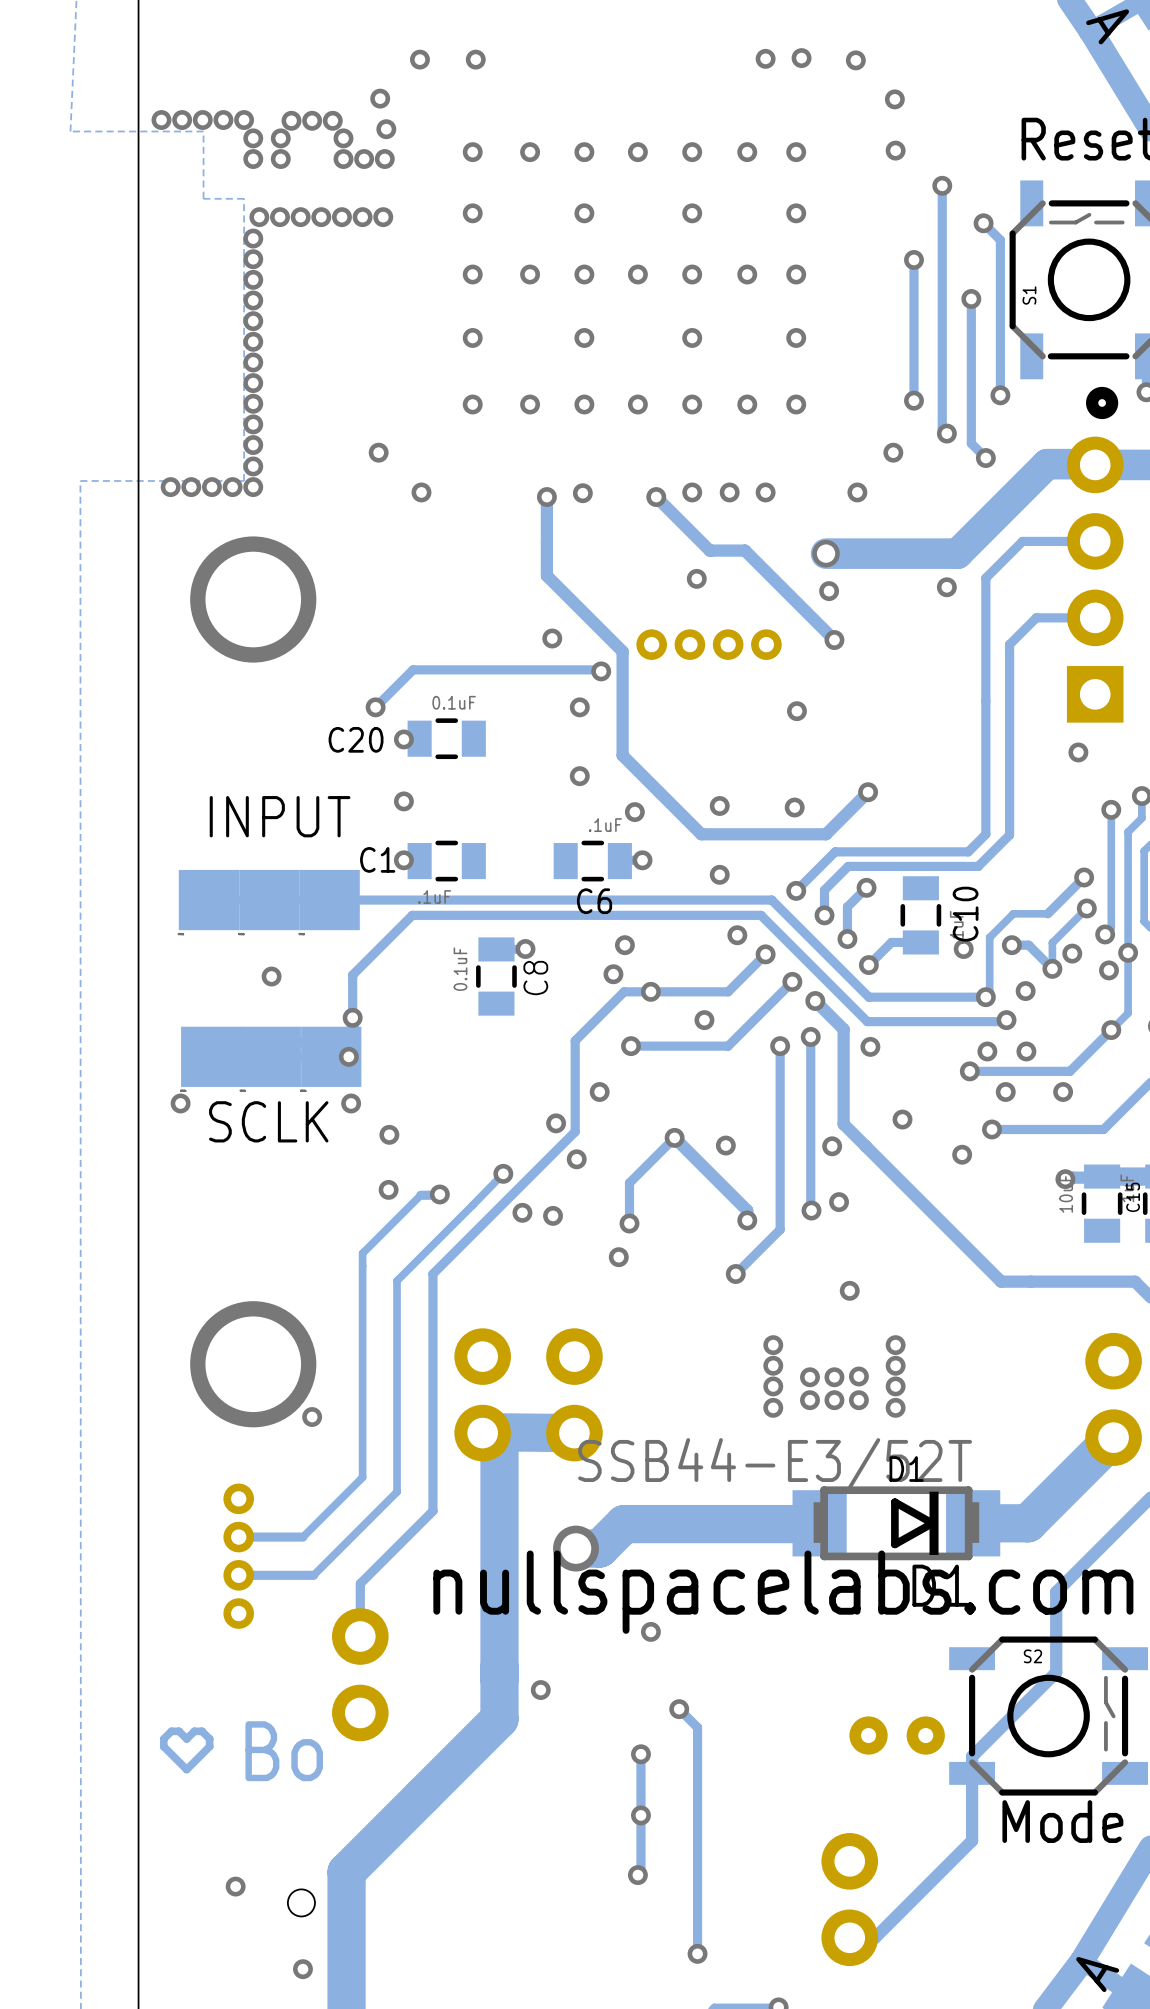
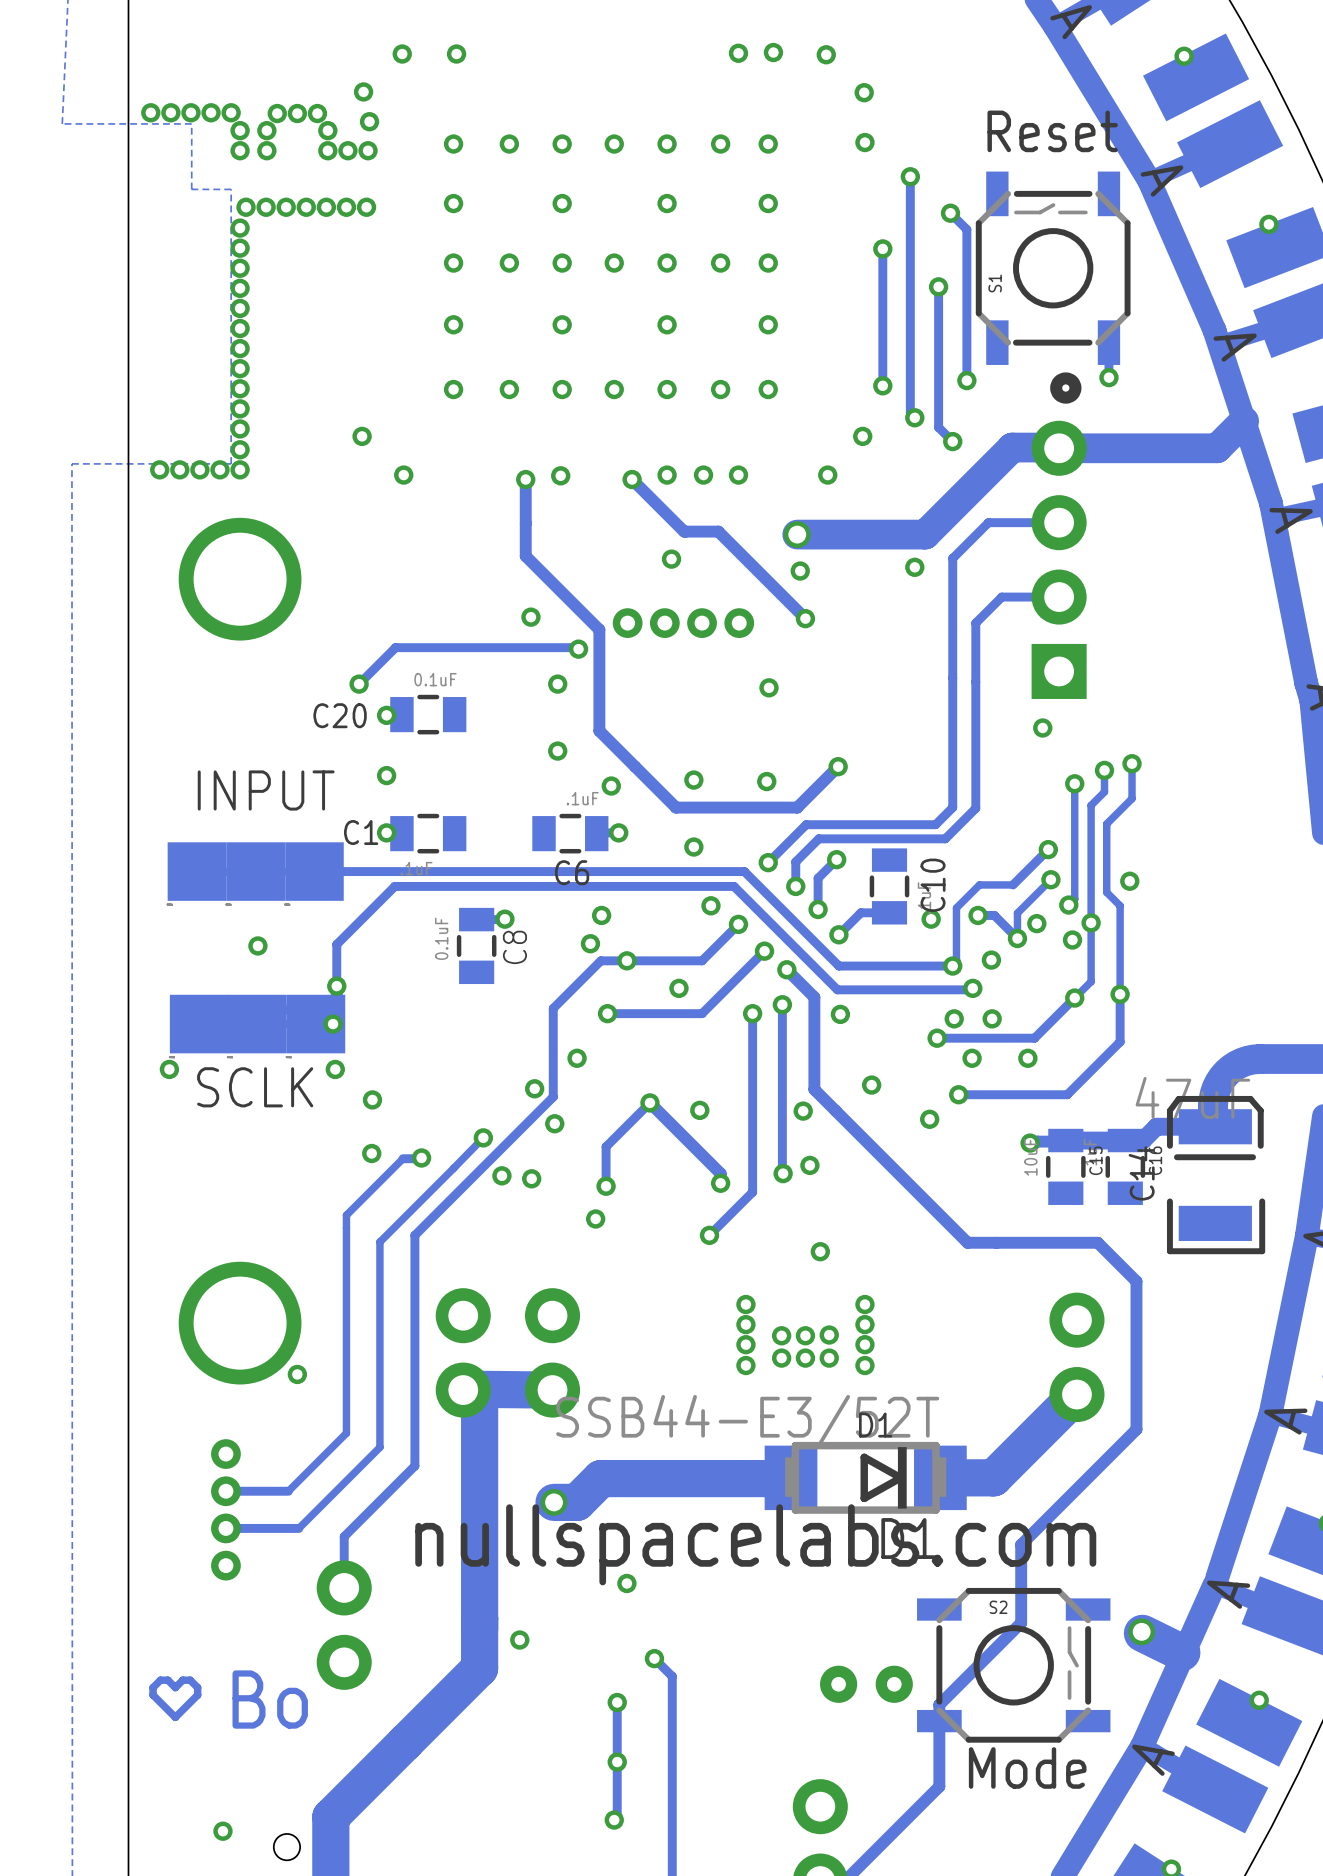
via size: [553, 1525, 599, 1572] -> [540, 1489, 568, 1516]

